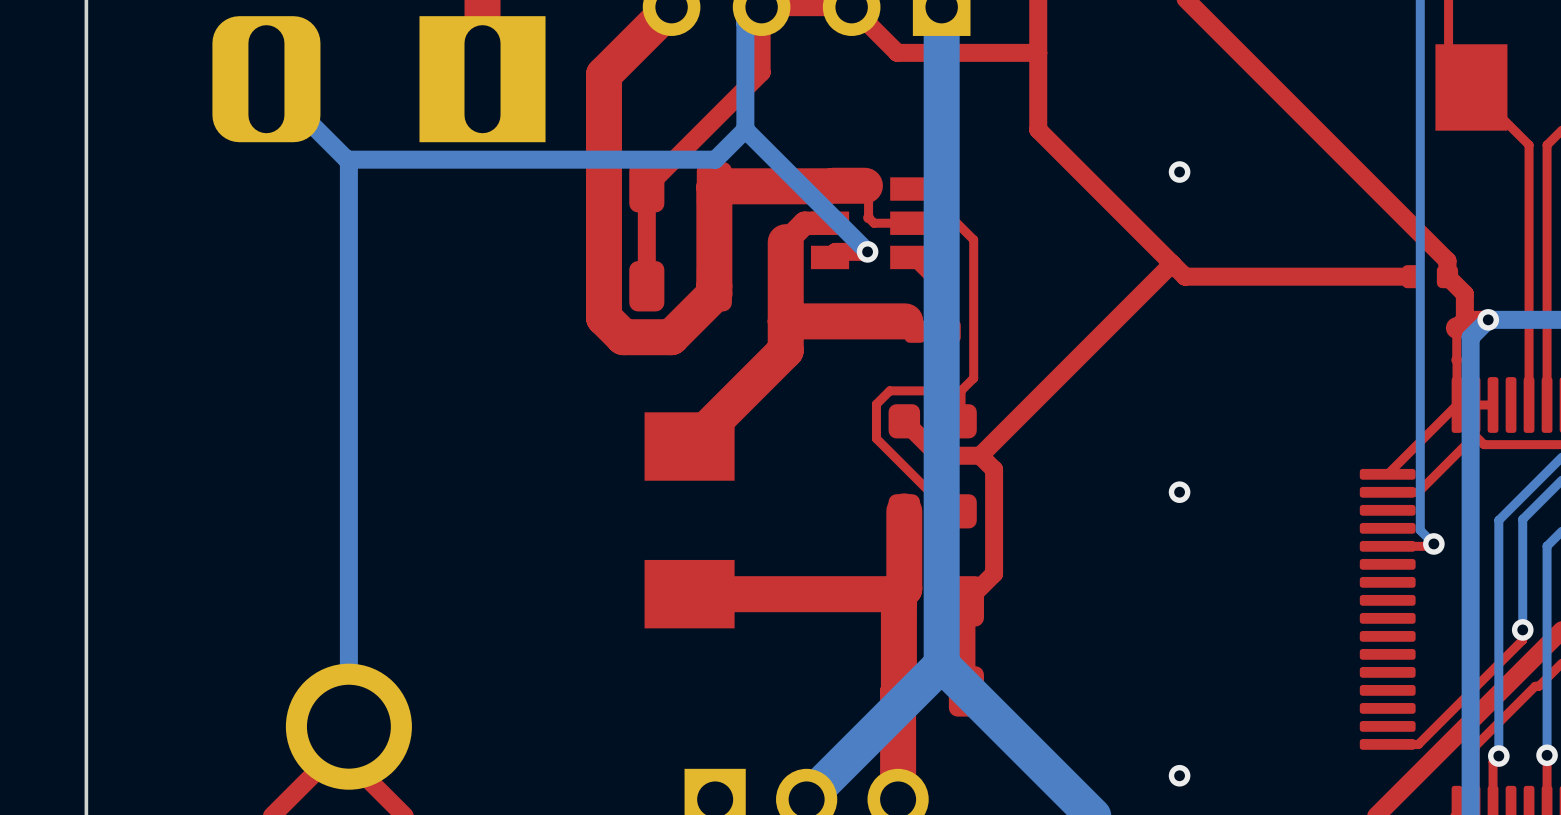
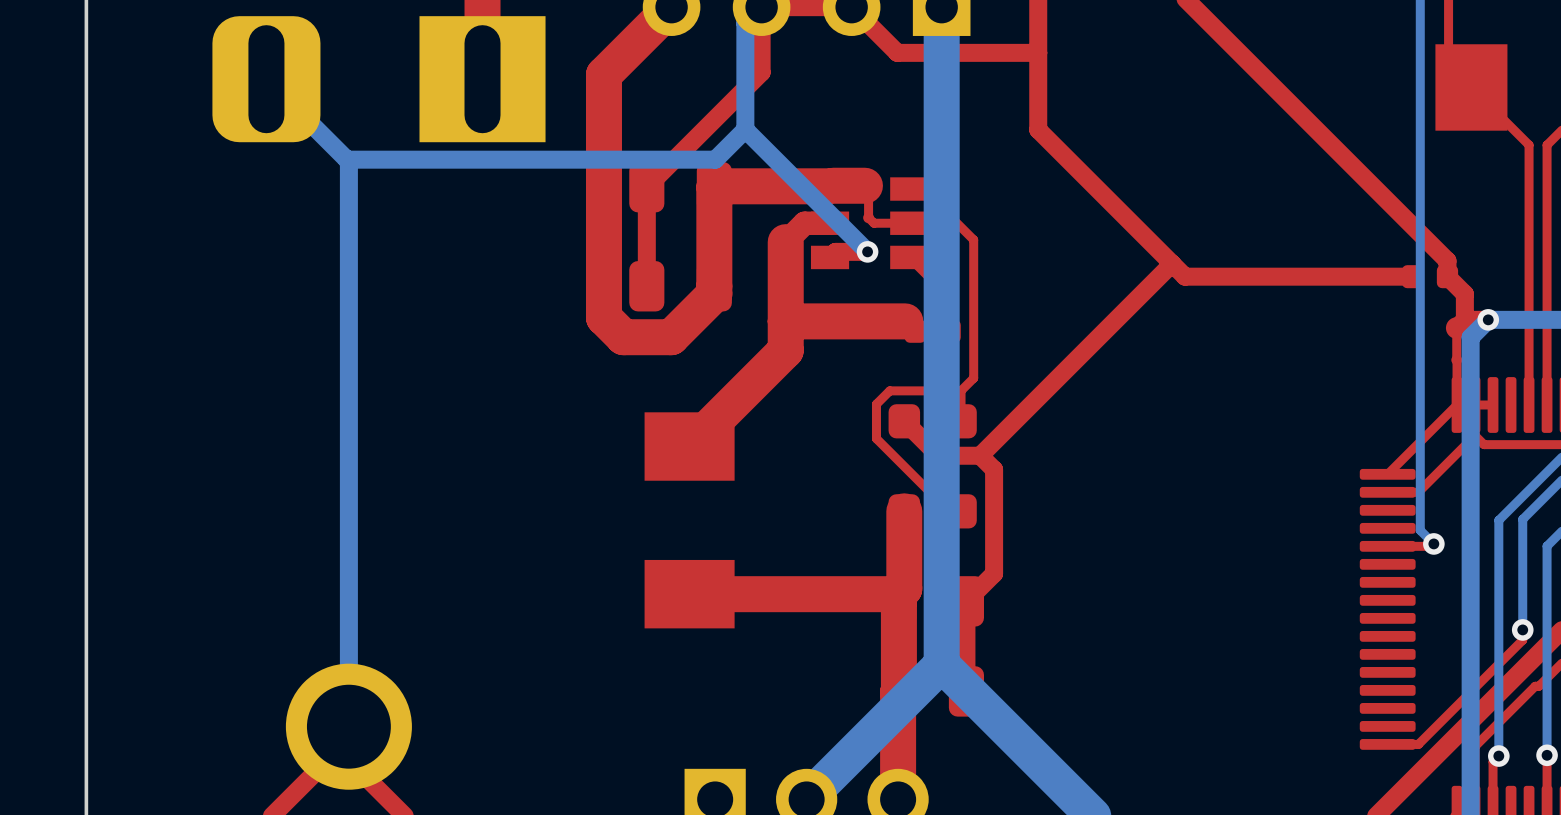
via: (1179, 172) -> none
via: (1179, 492) -> none
via: (1179, 775) -> none

